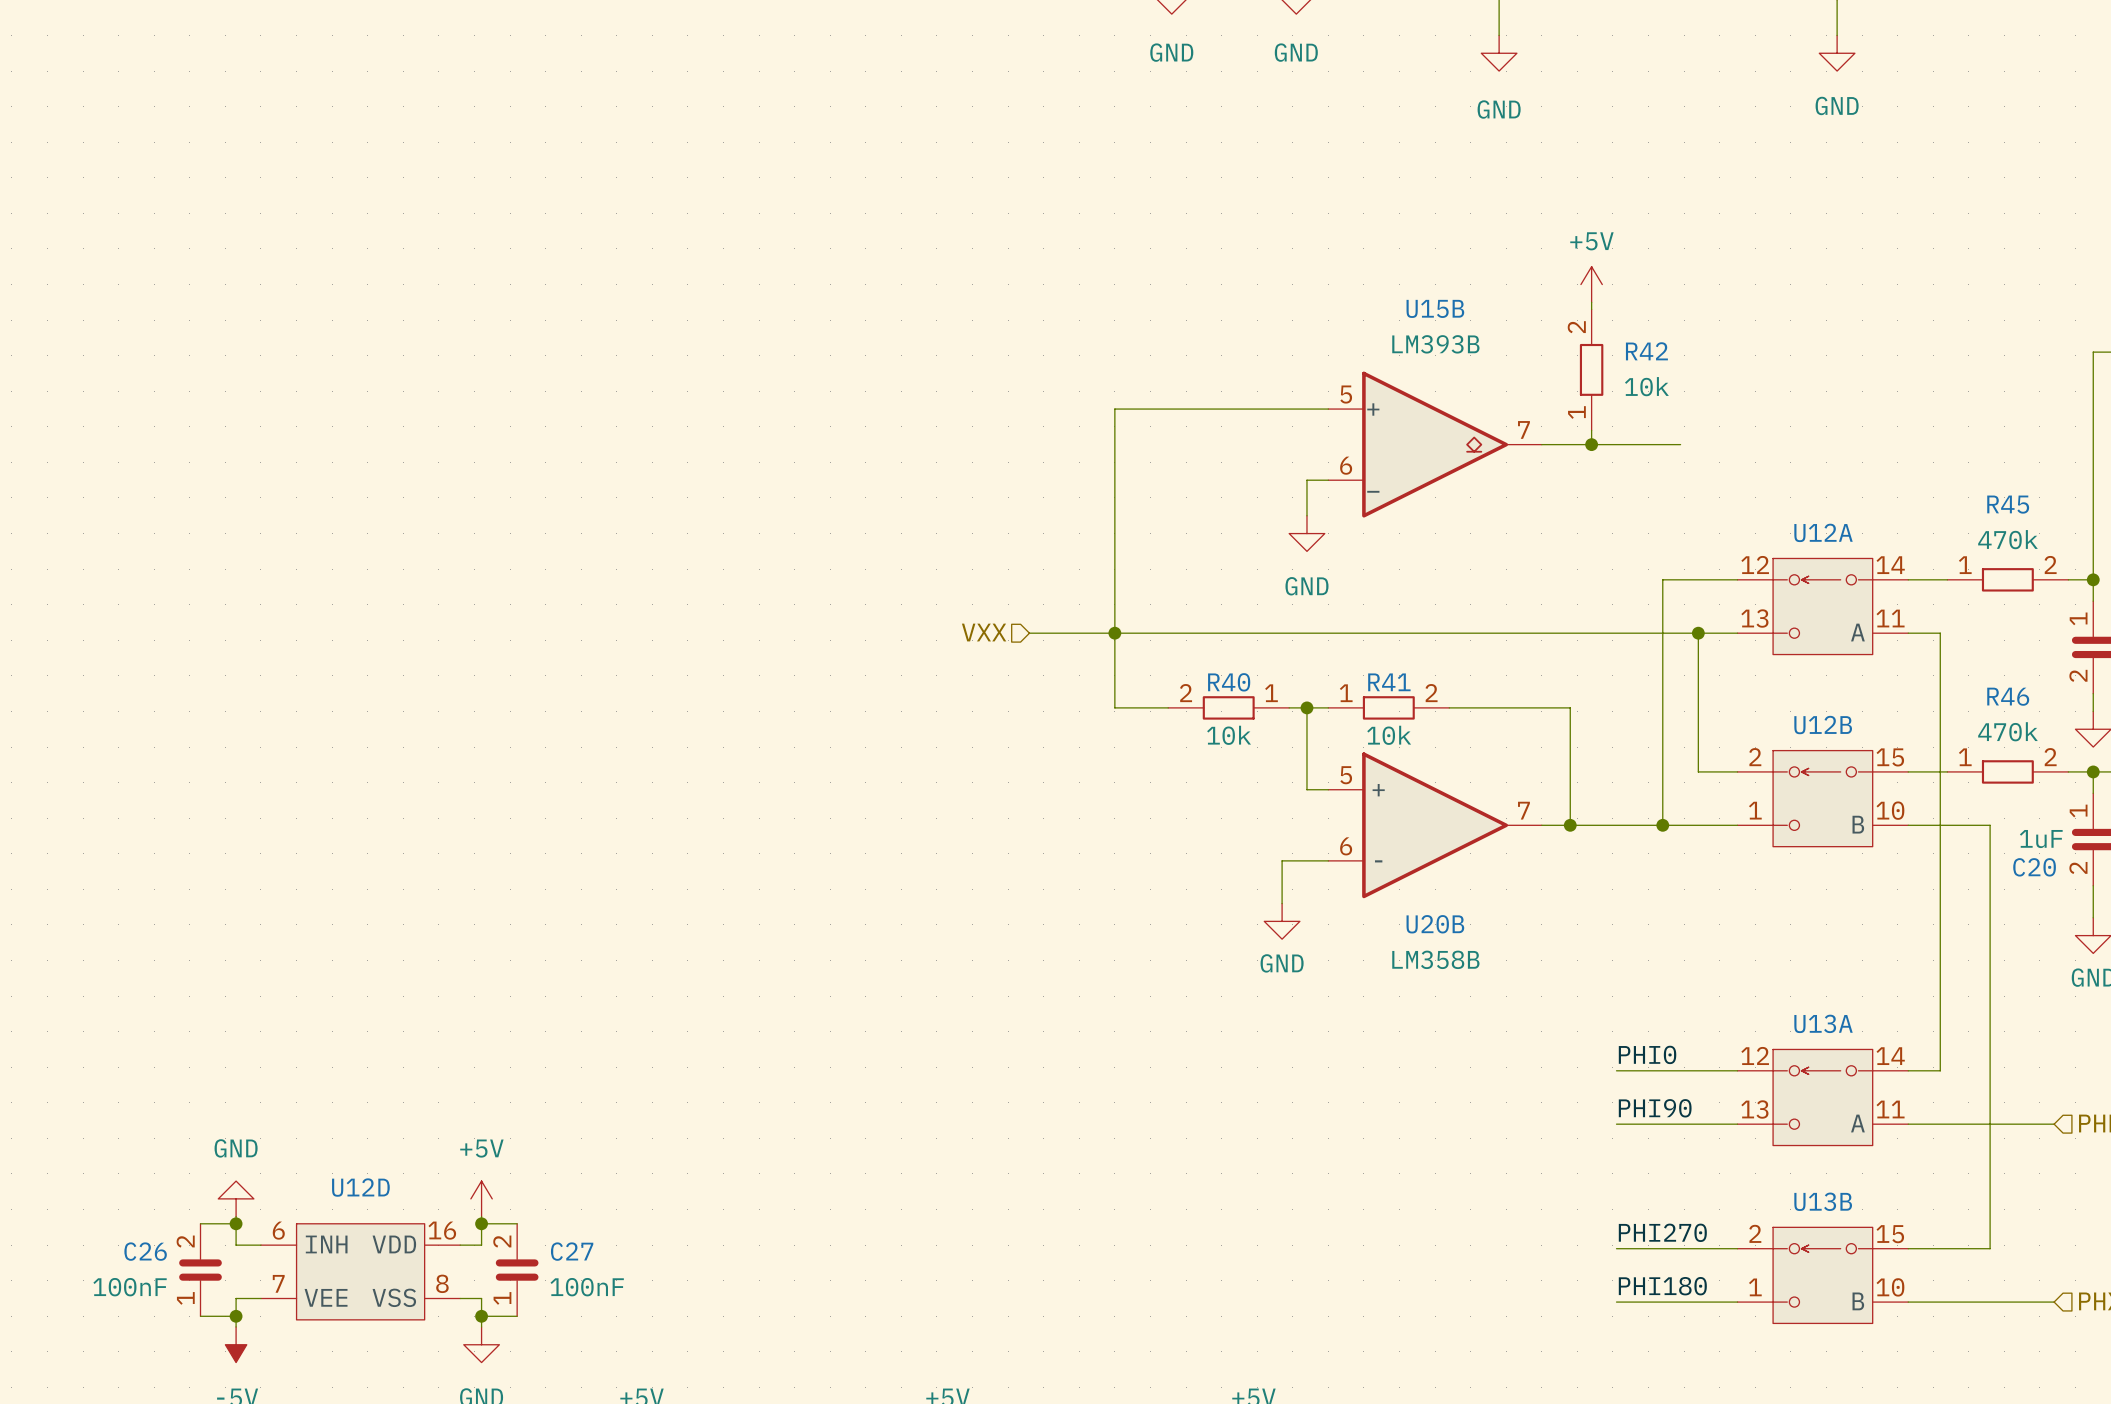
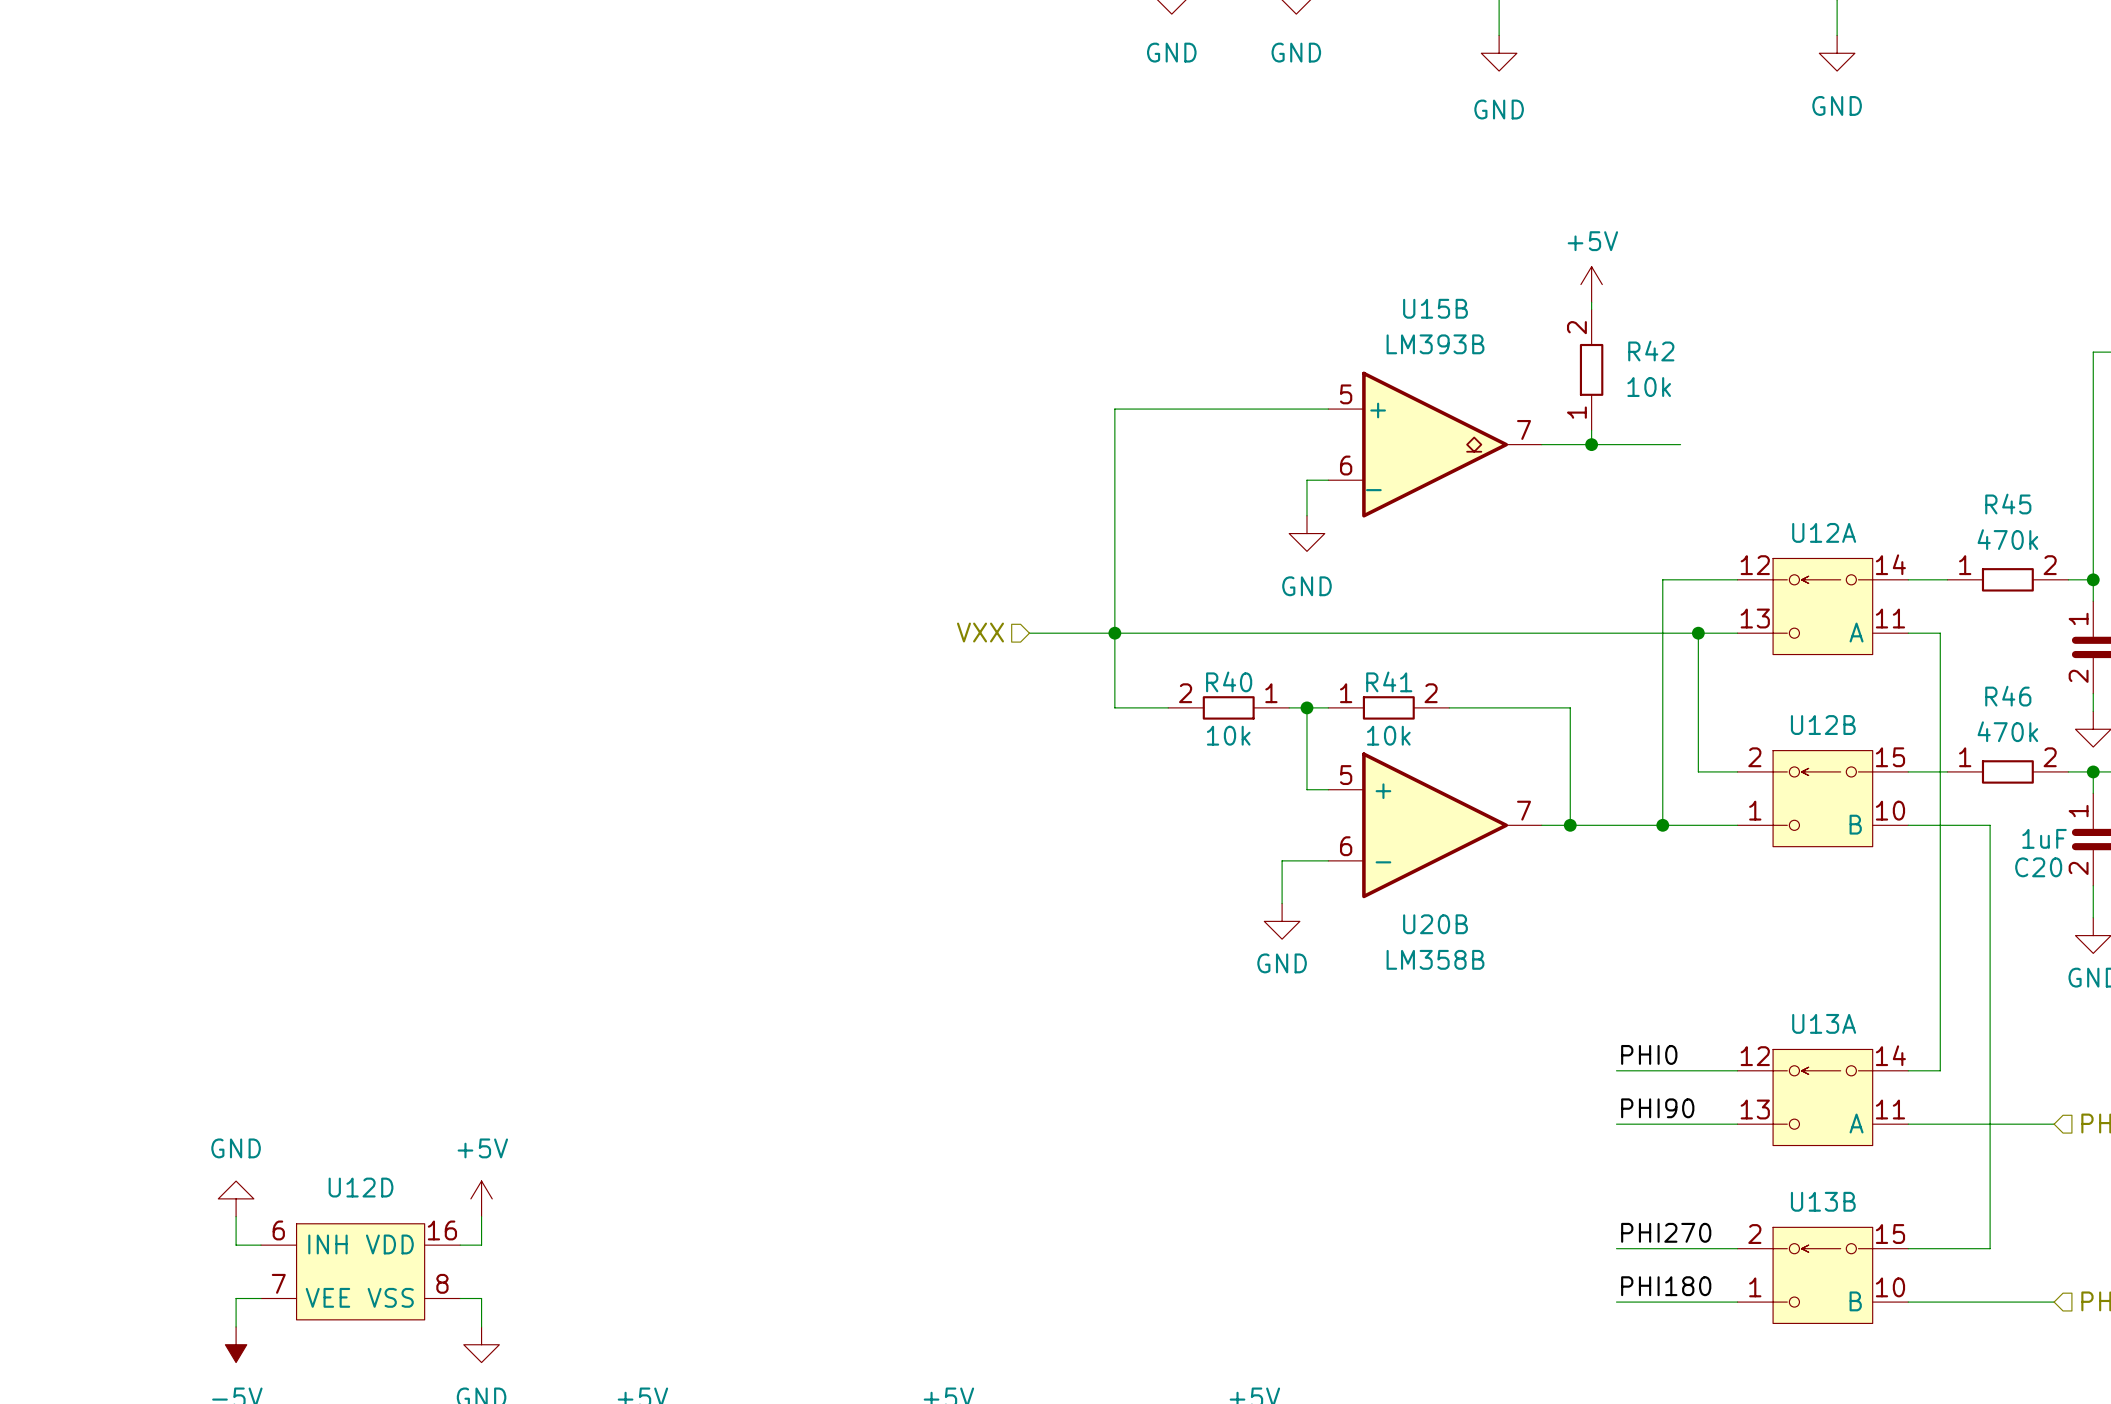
wire: (200, 1223) (236, 1223) -> none
junction: (236, 1223) -> none
wire: (481, 1223) (517, 1223) -> none
junction: (481, 1223) -> none
C26: (200, 1270) -> none
C27: (517, 1270) -> none
wire: (200, 1316) (236, 1316) -> none
junction: (236, 1316) -> none
wire: (481, 1316) (517, 1316) -> none
junction: (481, 1316) -> none

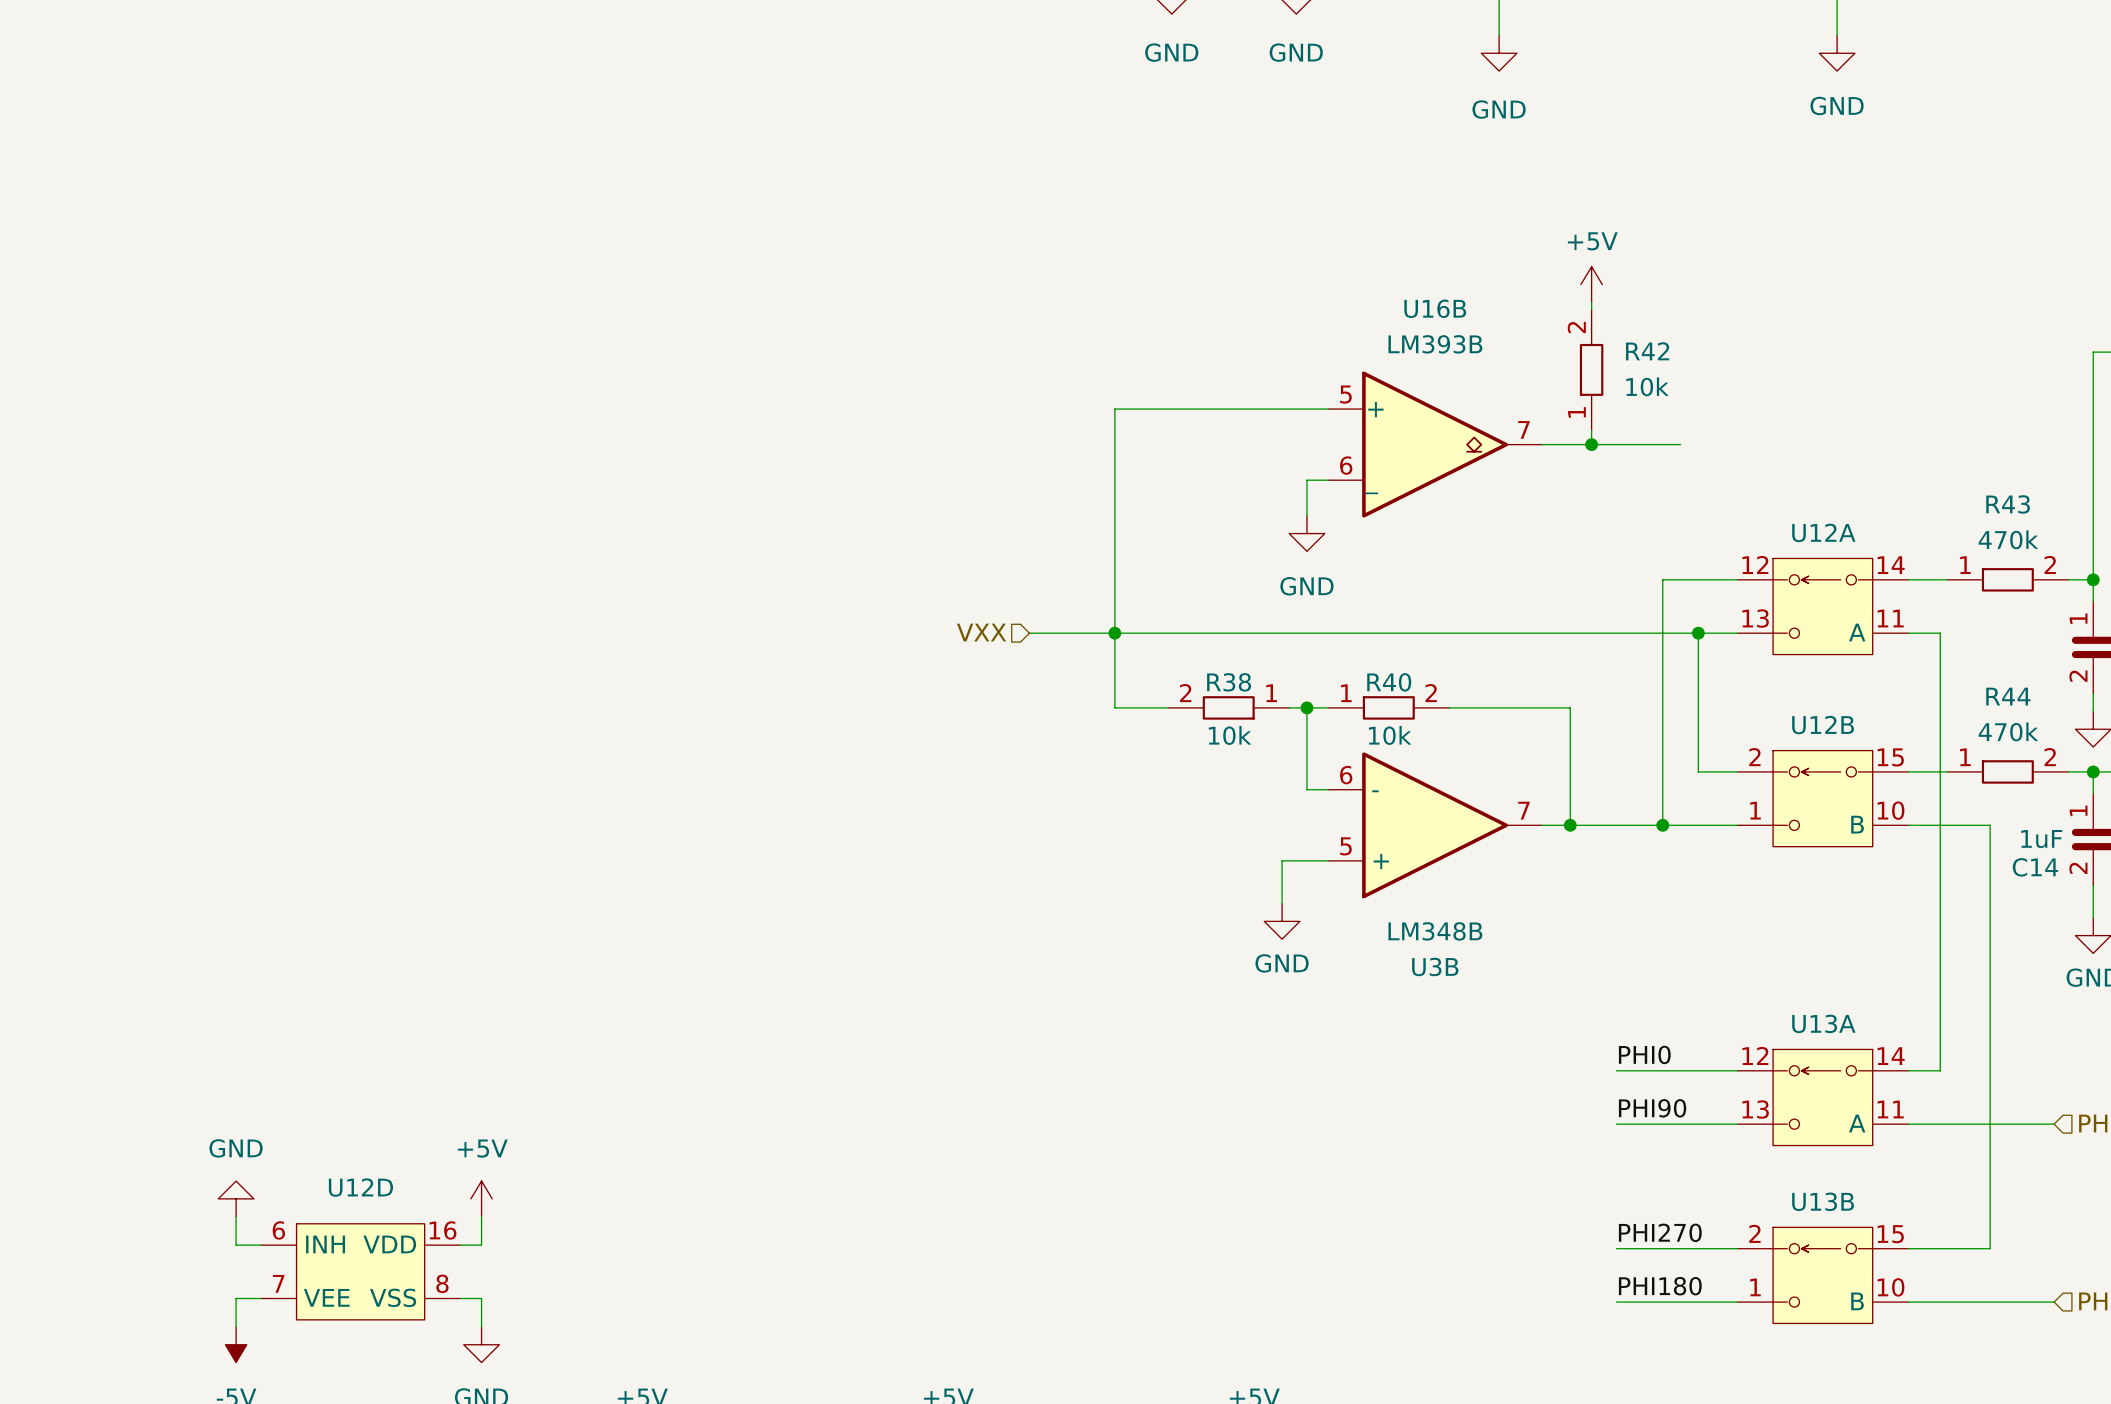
U15B name: U15B (1435, 308) -> U16B (1435, 308)
R45 name: R45 (2008, 504) -> R43 (2008, 504)
R40 name: R40 (1229, 681) -> R38 (1229, 682)
R41 name: R41 (1389, 681) -> R40 (1389, 682)
R46 name: R46 (2008, 696) -> R44 (2008, 696)
U20B flip: as is (1435, 825) -> up-down (1435, 825)
C20 name: C20 (2038, 867) -> C14 (2035, 867)
U20B name: U20B (1435, 924) -> U3B (1435, 966)
U20B value: LM358B (1435, 959) -> LM348B (1435, 931)

